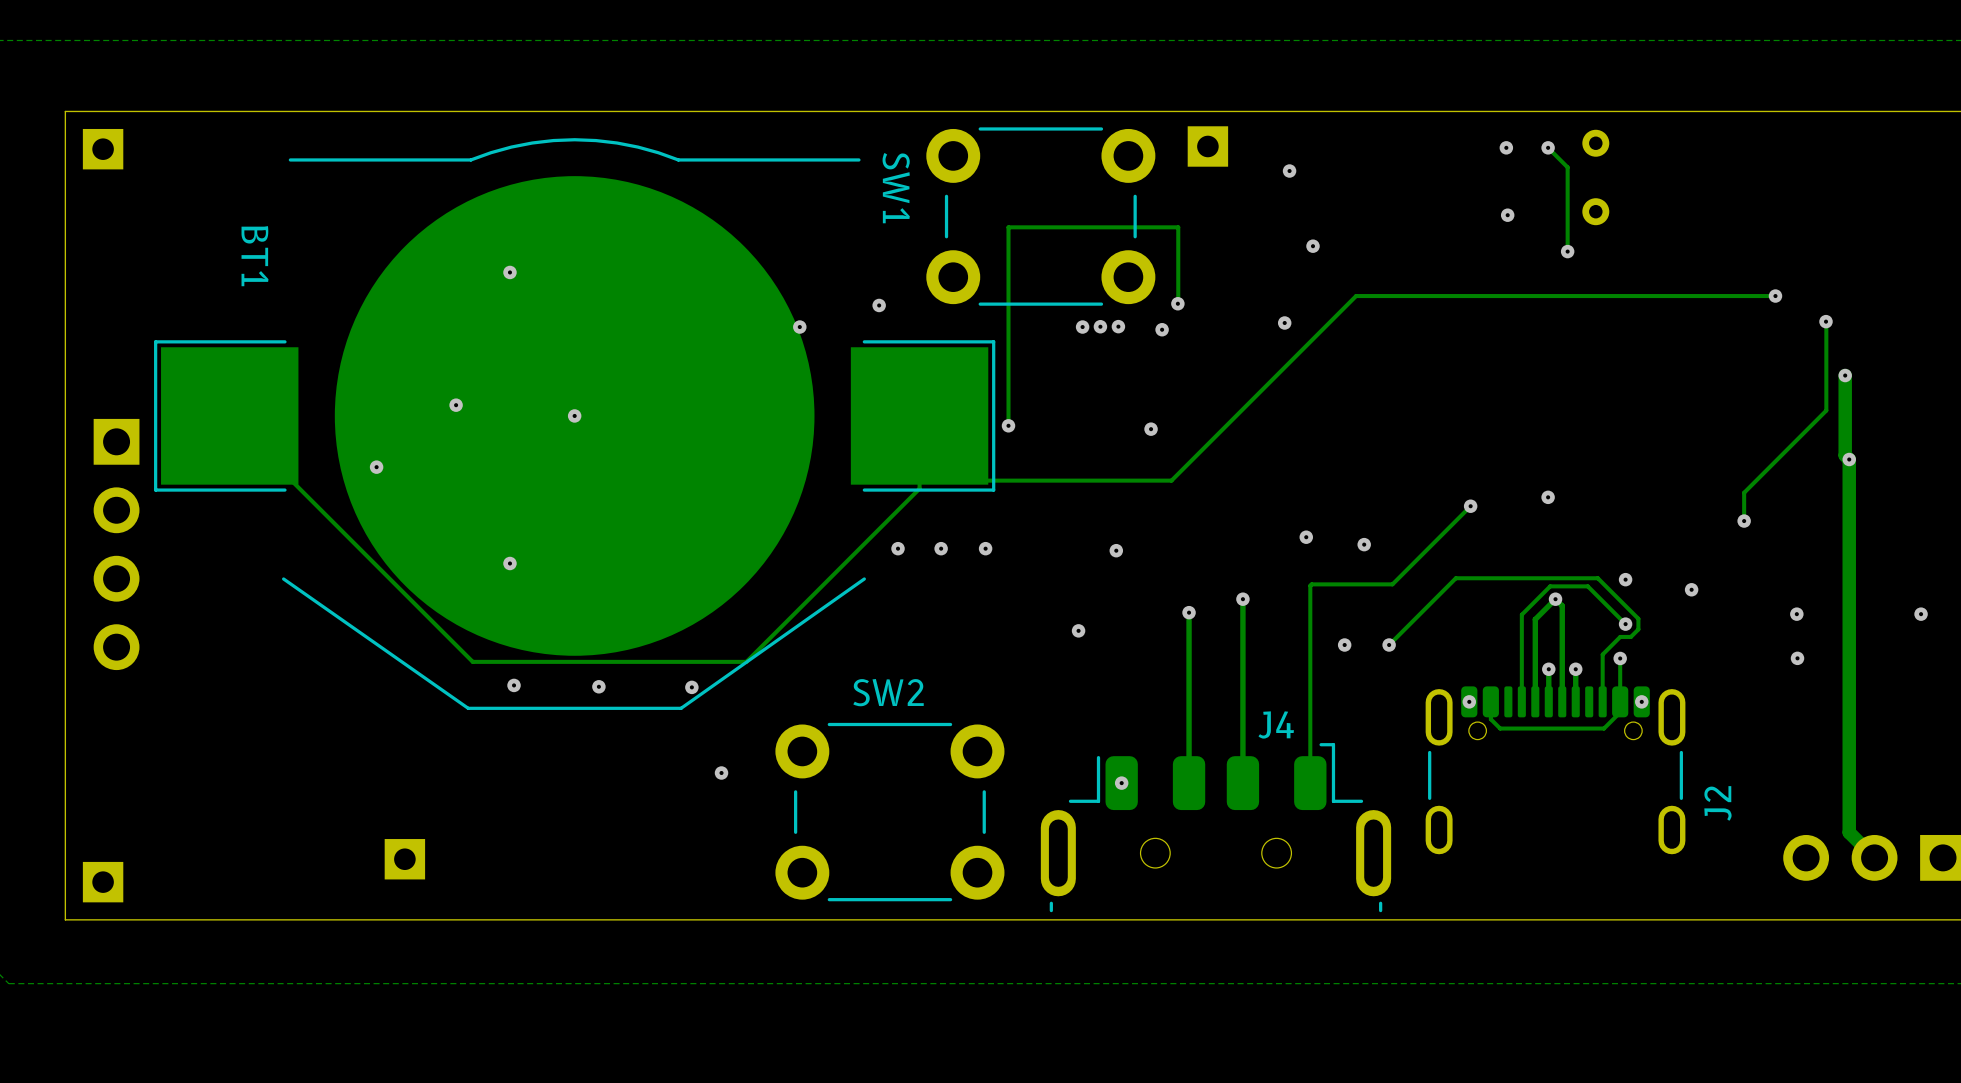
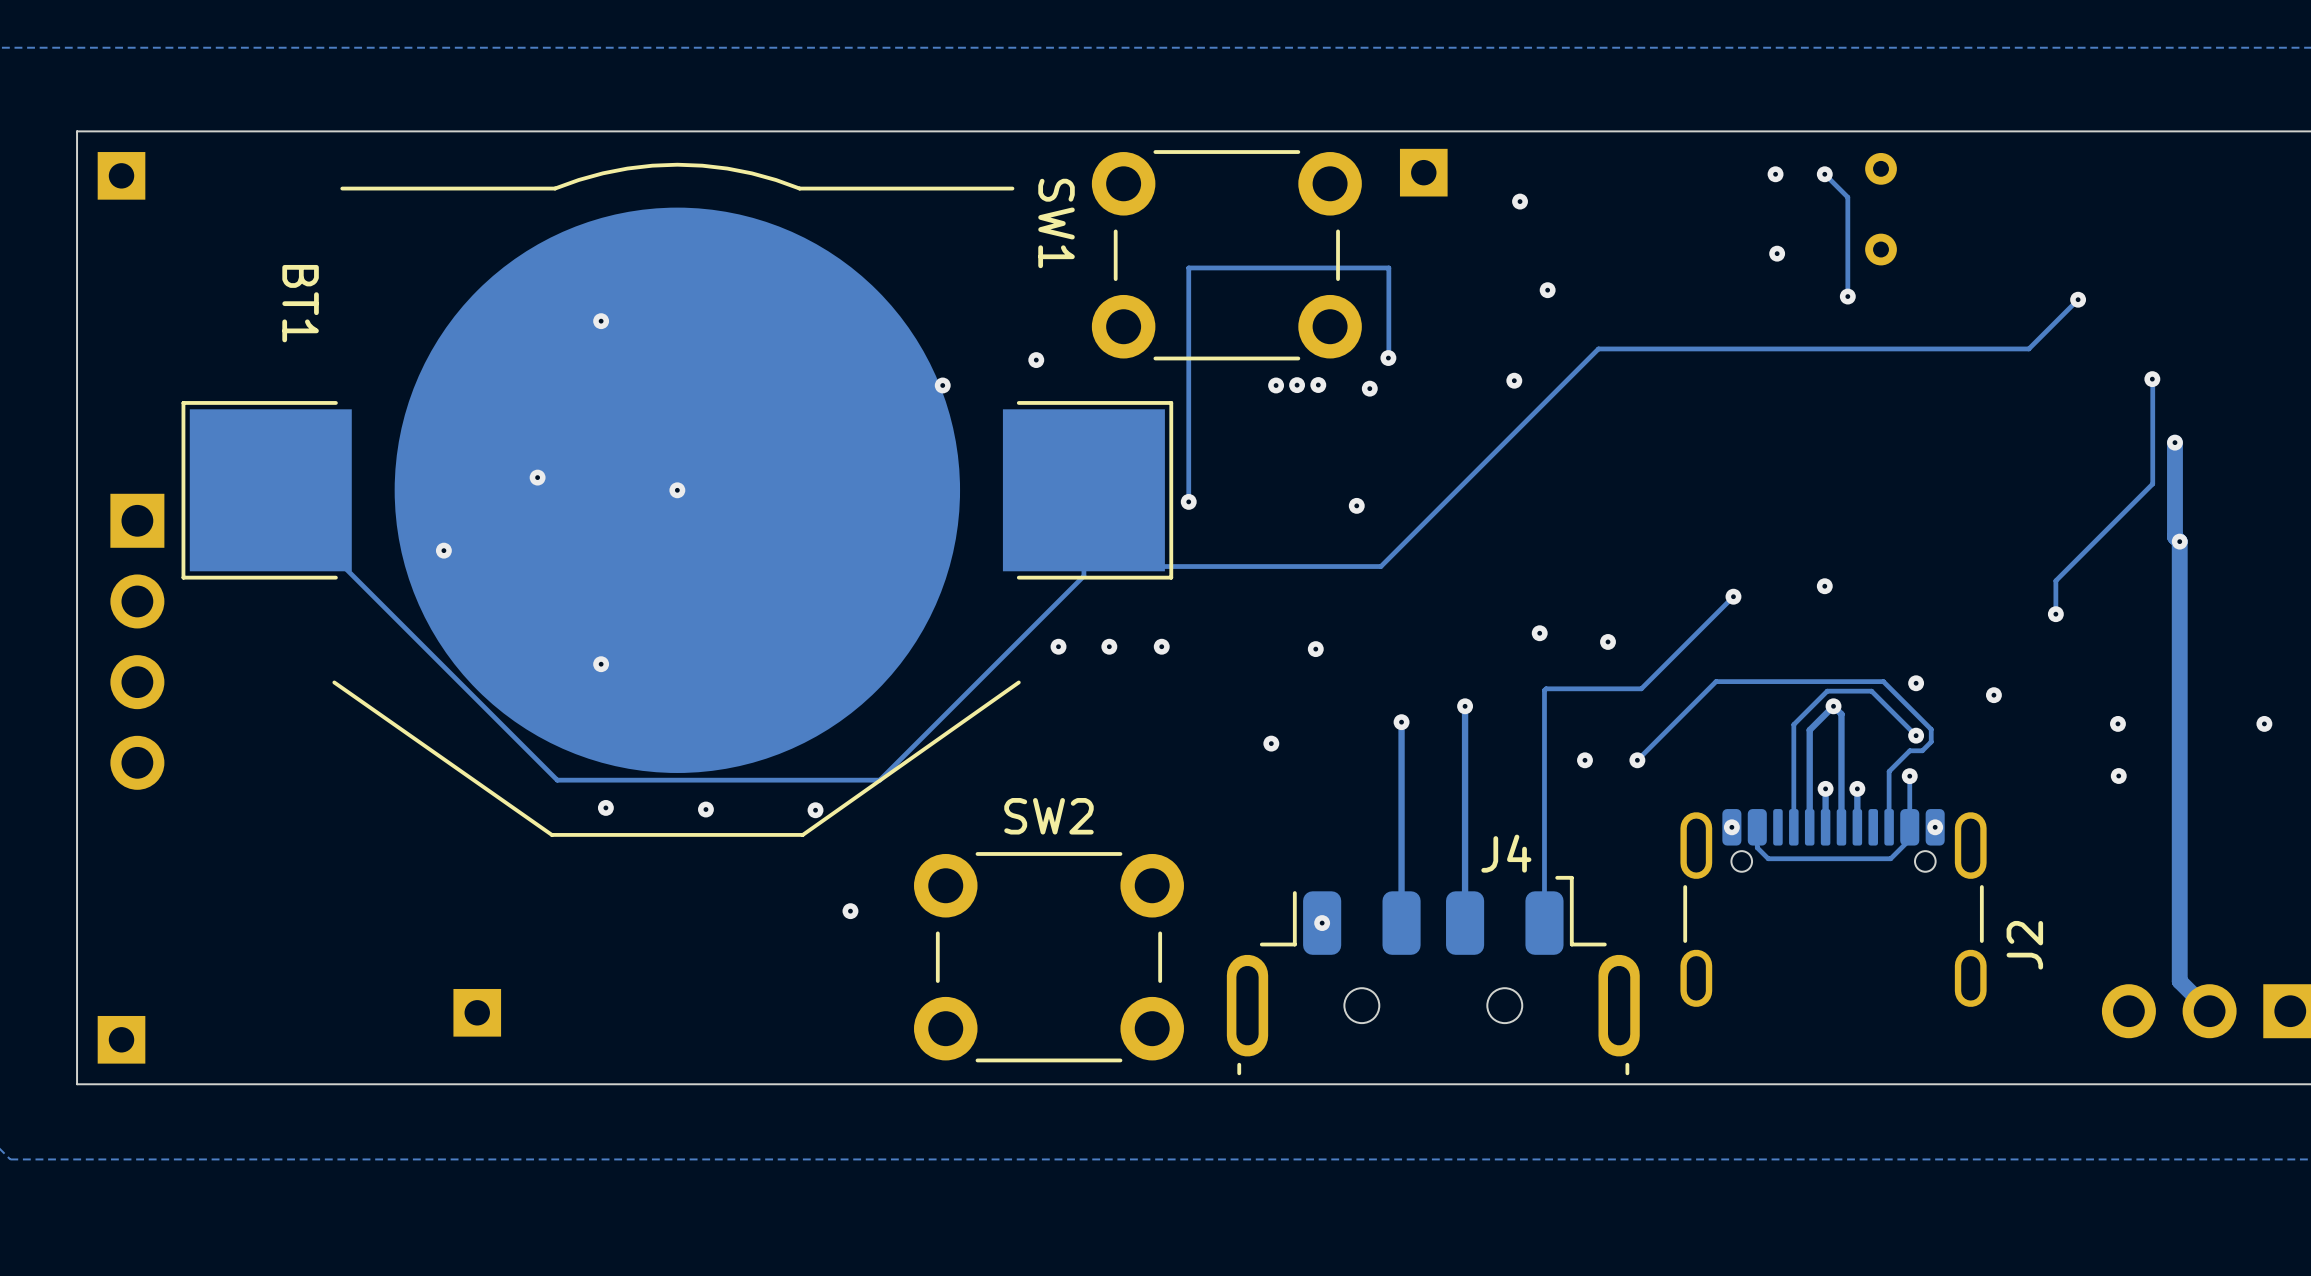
track: (1775, 296) (1721, 296) -> (2078, 299) (2028, 348)
via position: (1775, 296) -> (2078, 299)

